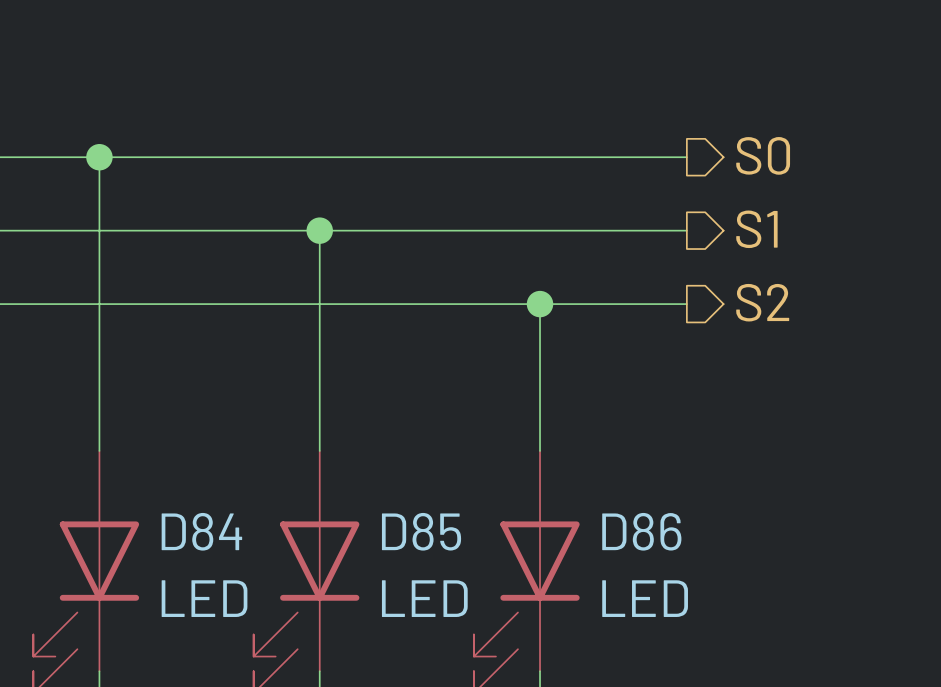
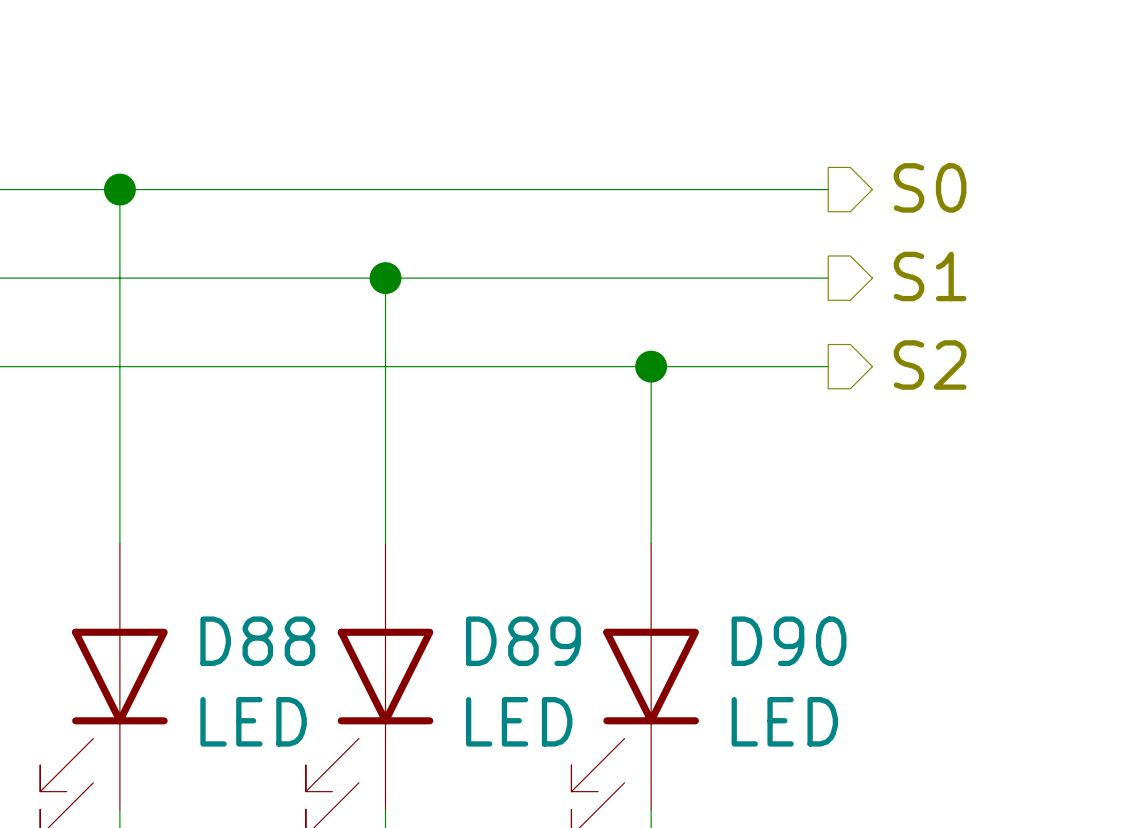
D84 name: D84 (201, 531) -> D88 (257, 641)
D85 name: D85 (421, 531) -> D89 (523, 641)
D86 name: D86 (641, 531) -> D90 (789, 641)

